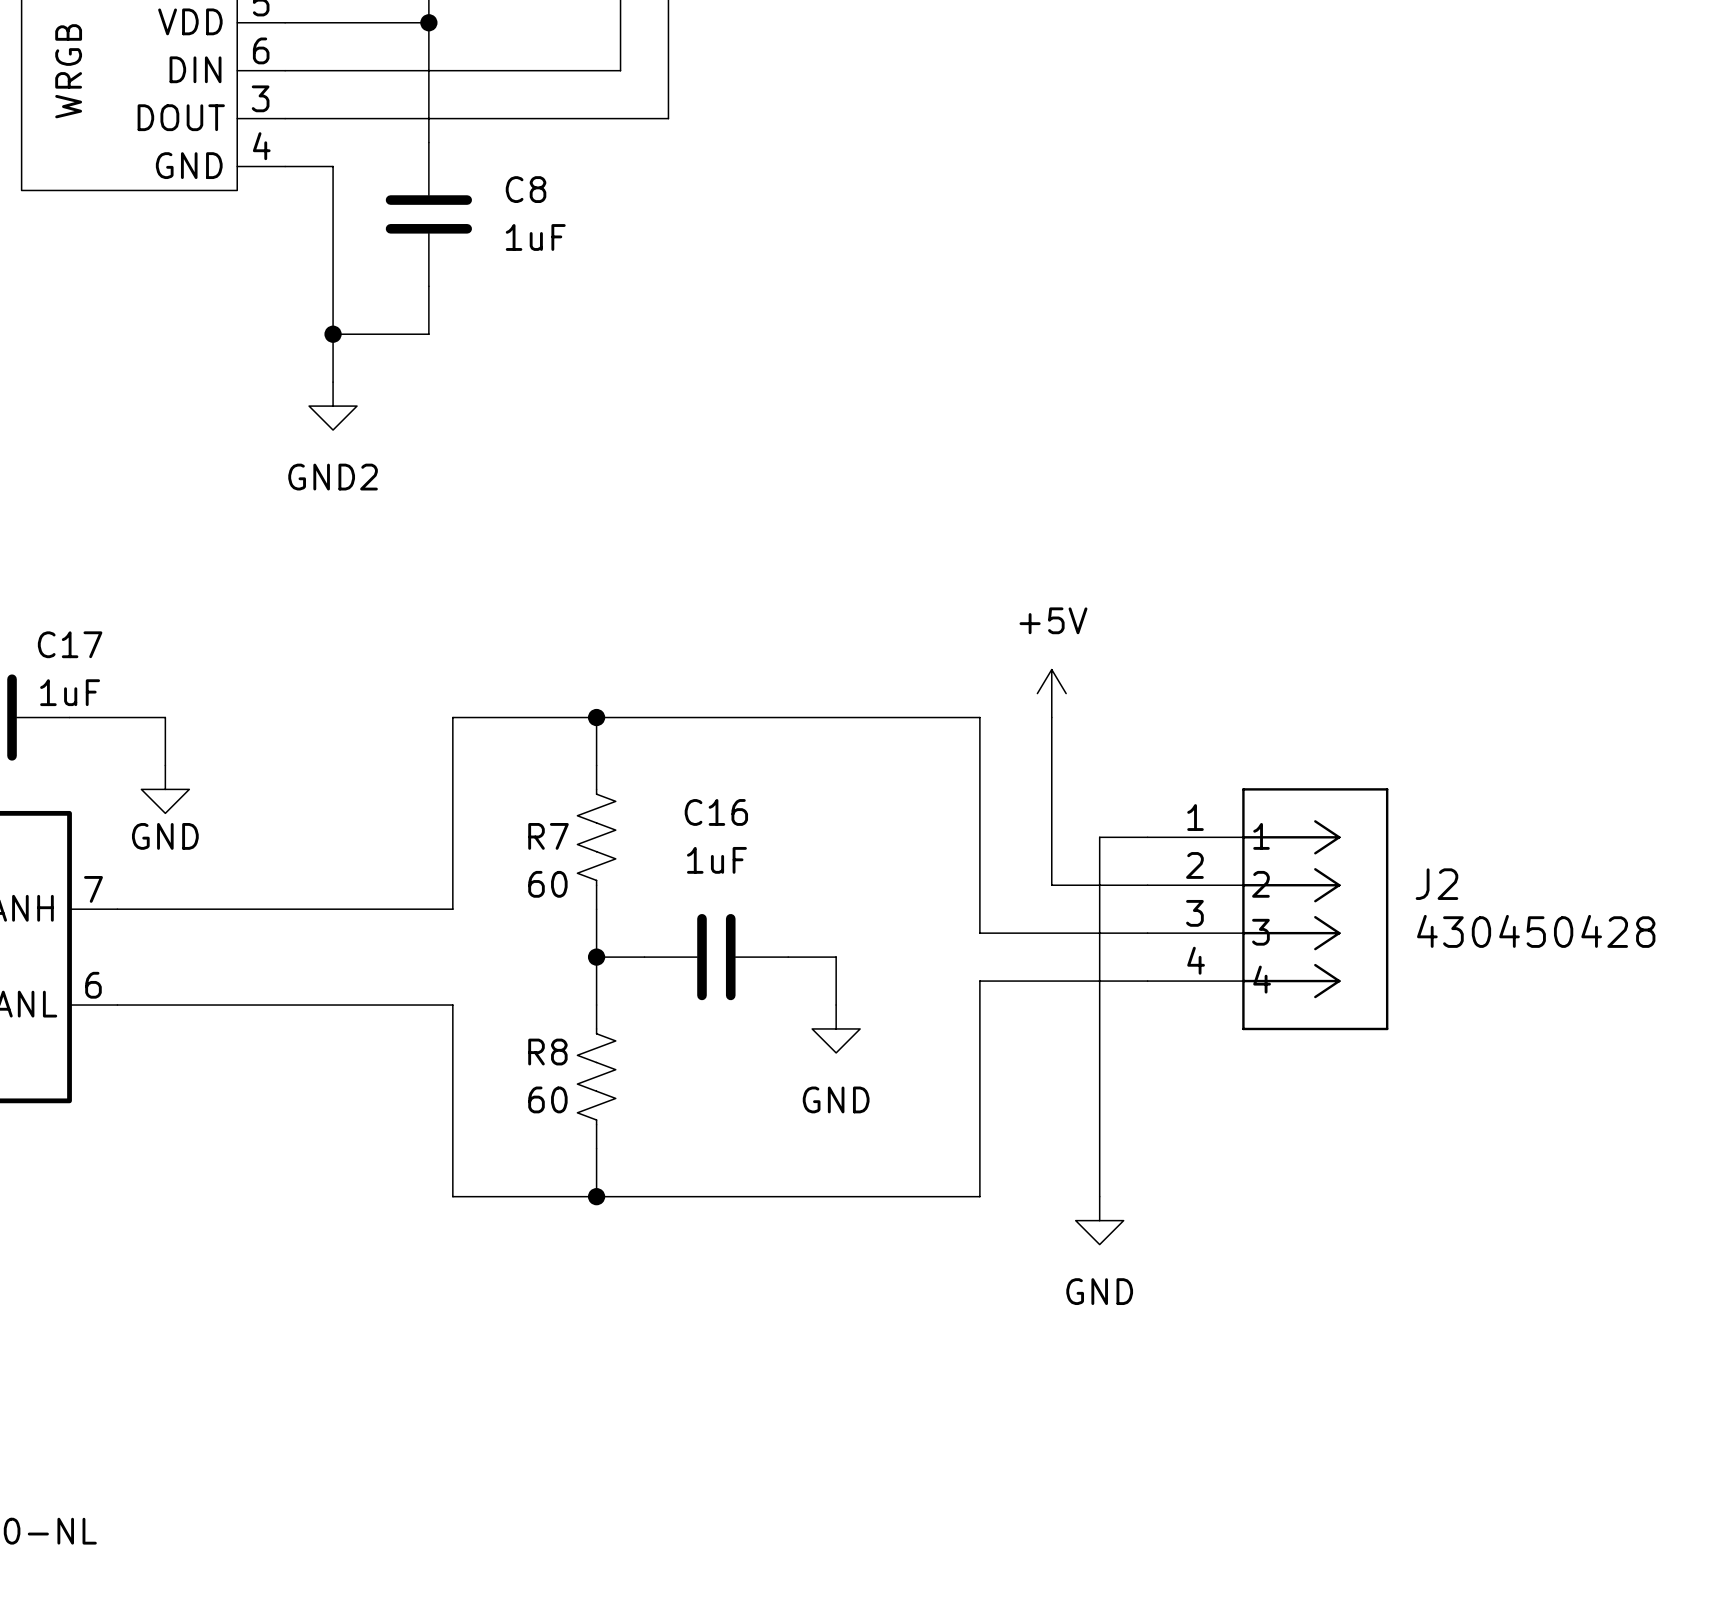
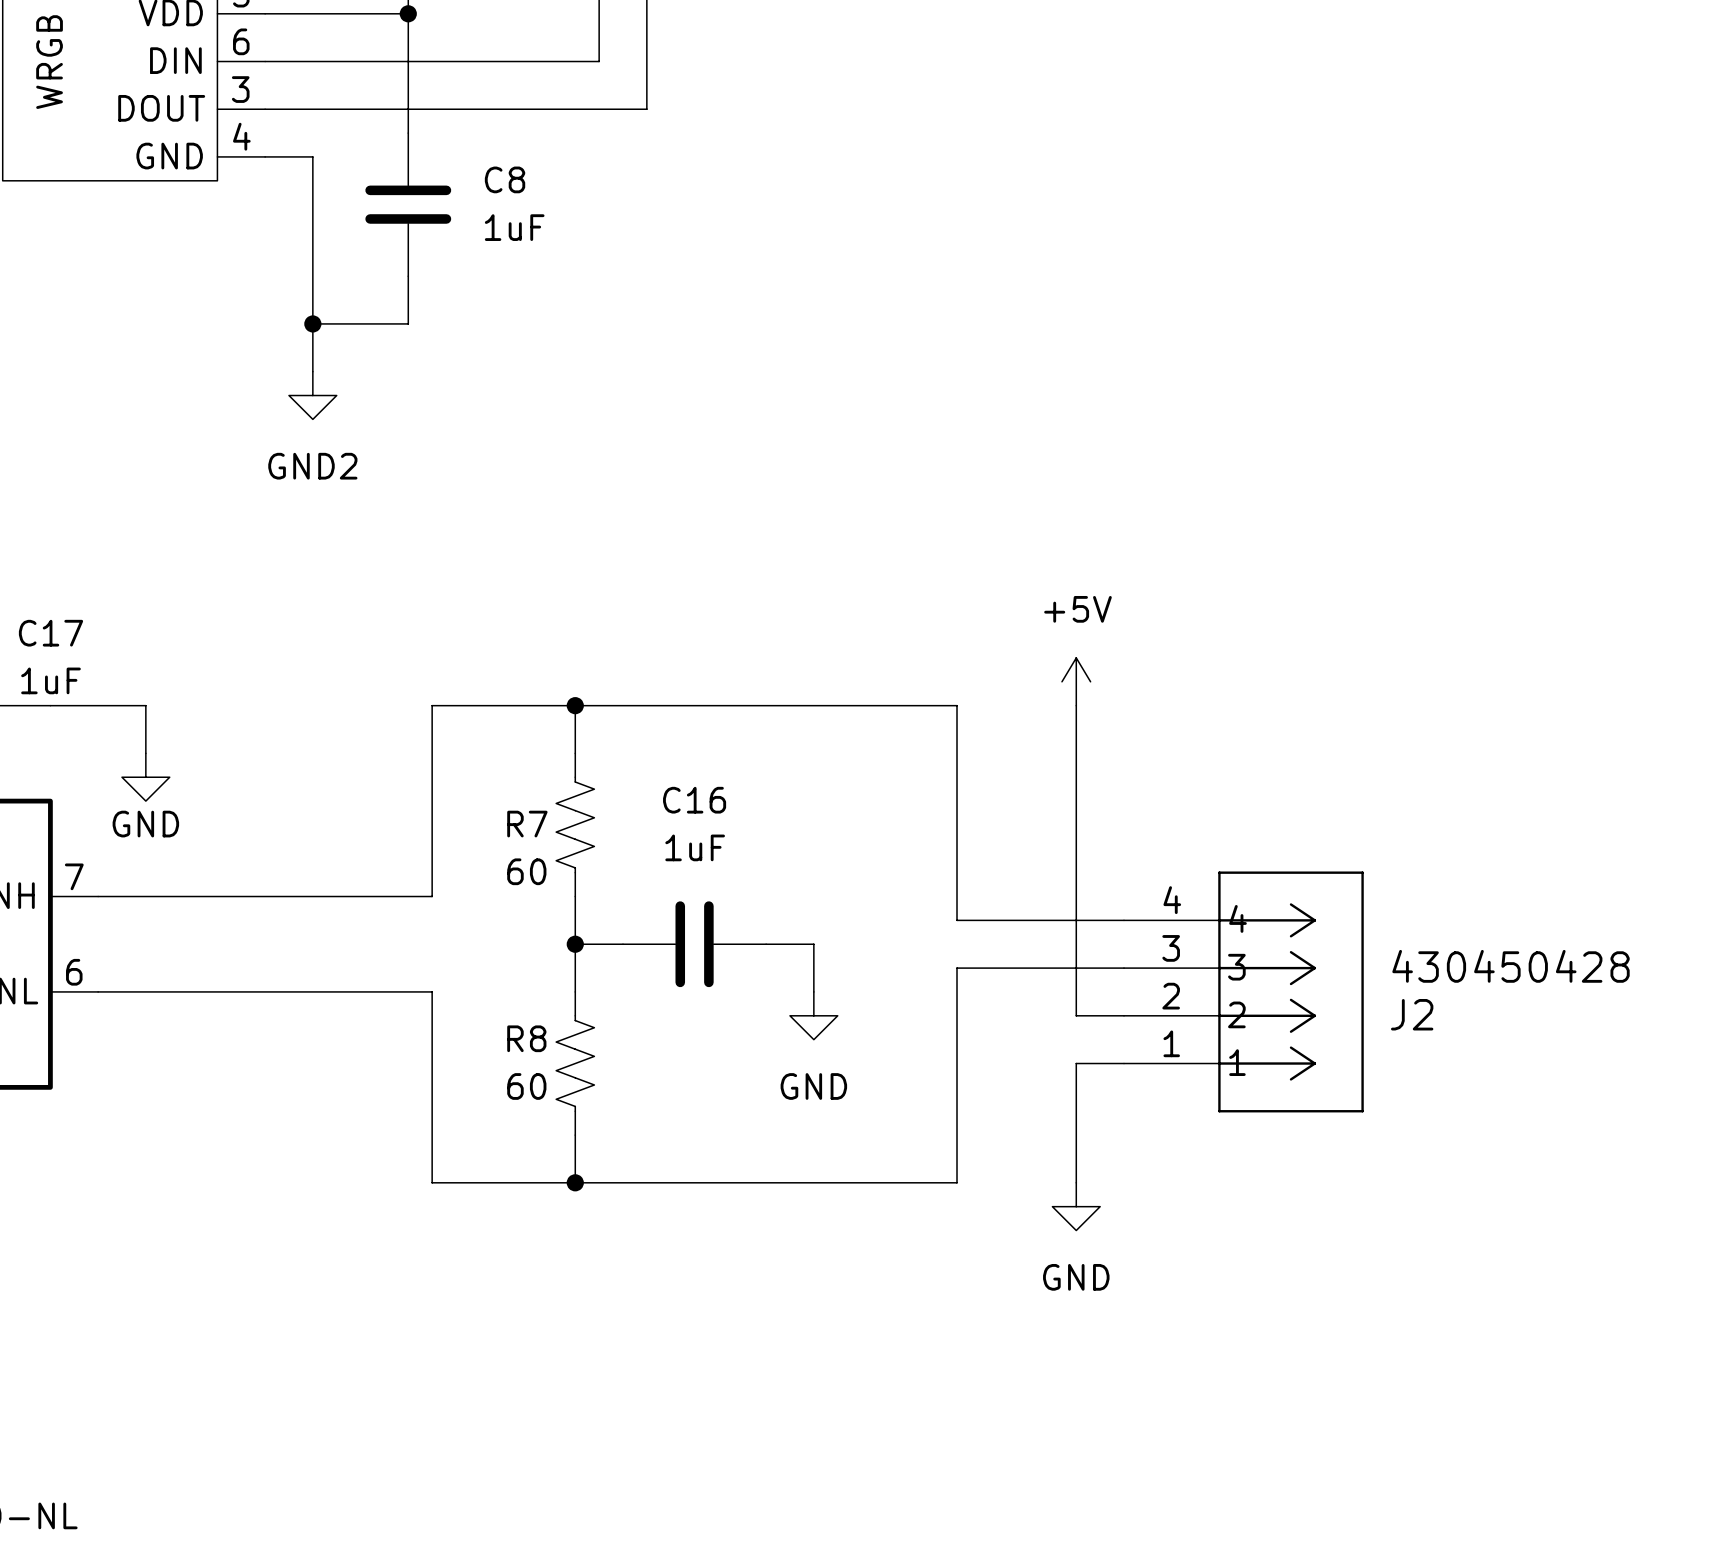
power symbol position: +5V (1051, 693) -> +5V (1076, 681)
wire: (1051, 717) (1051, 885) (1147, 885) -> none
wire: (1099, 837) (1147, 837) -> (1076, 824) (1076, 705)
J2 flip: as is (1315, 909) -> up-down (1291, 991)
wire: (1099, 1028) (1099, 1076) -> (1076, 1015) (1124, 1015)
wire: none -> (1076, 1063) (1124, 1063)

